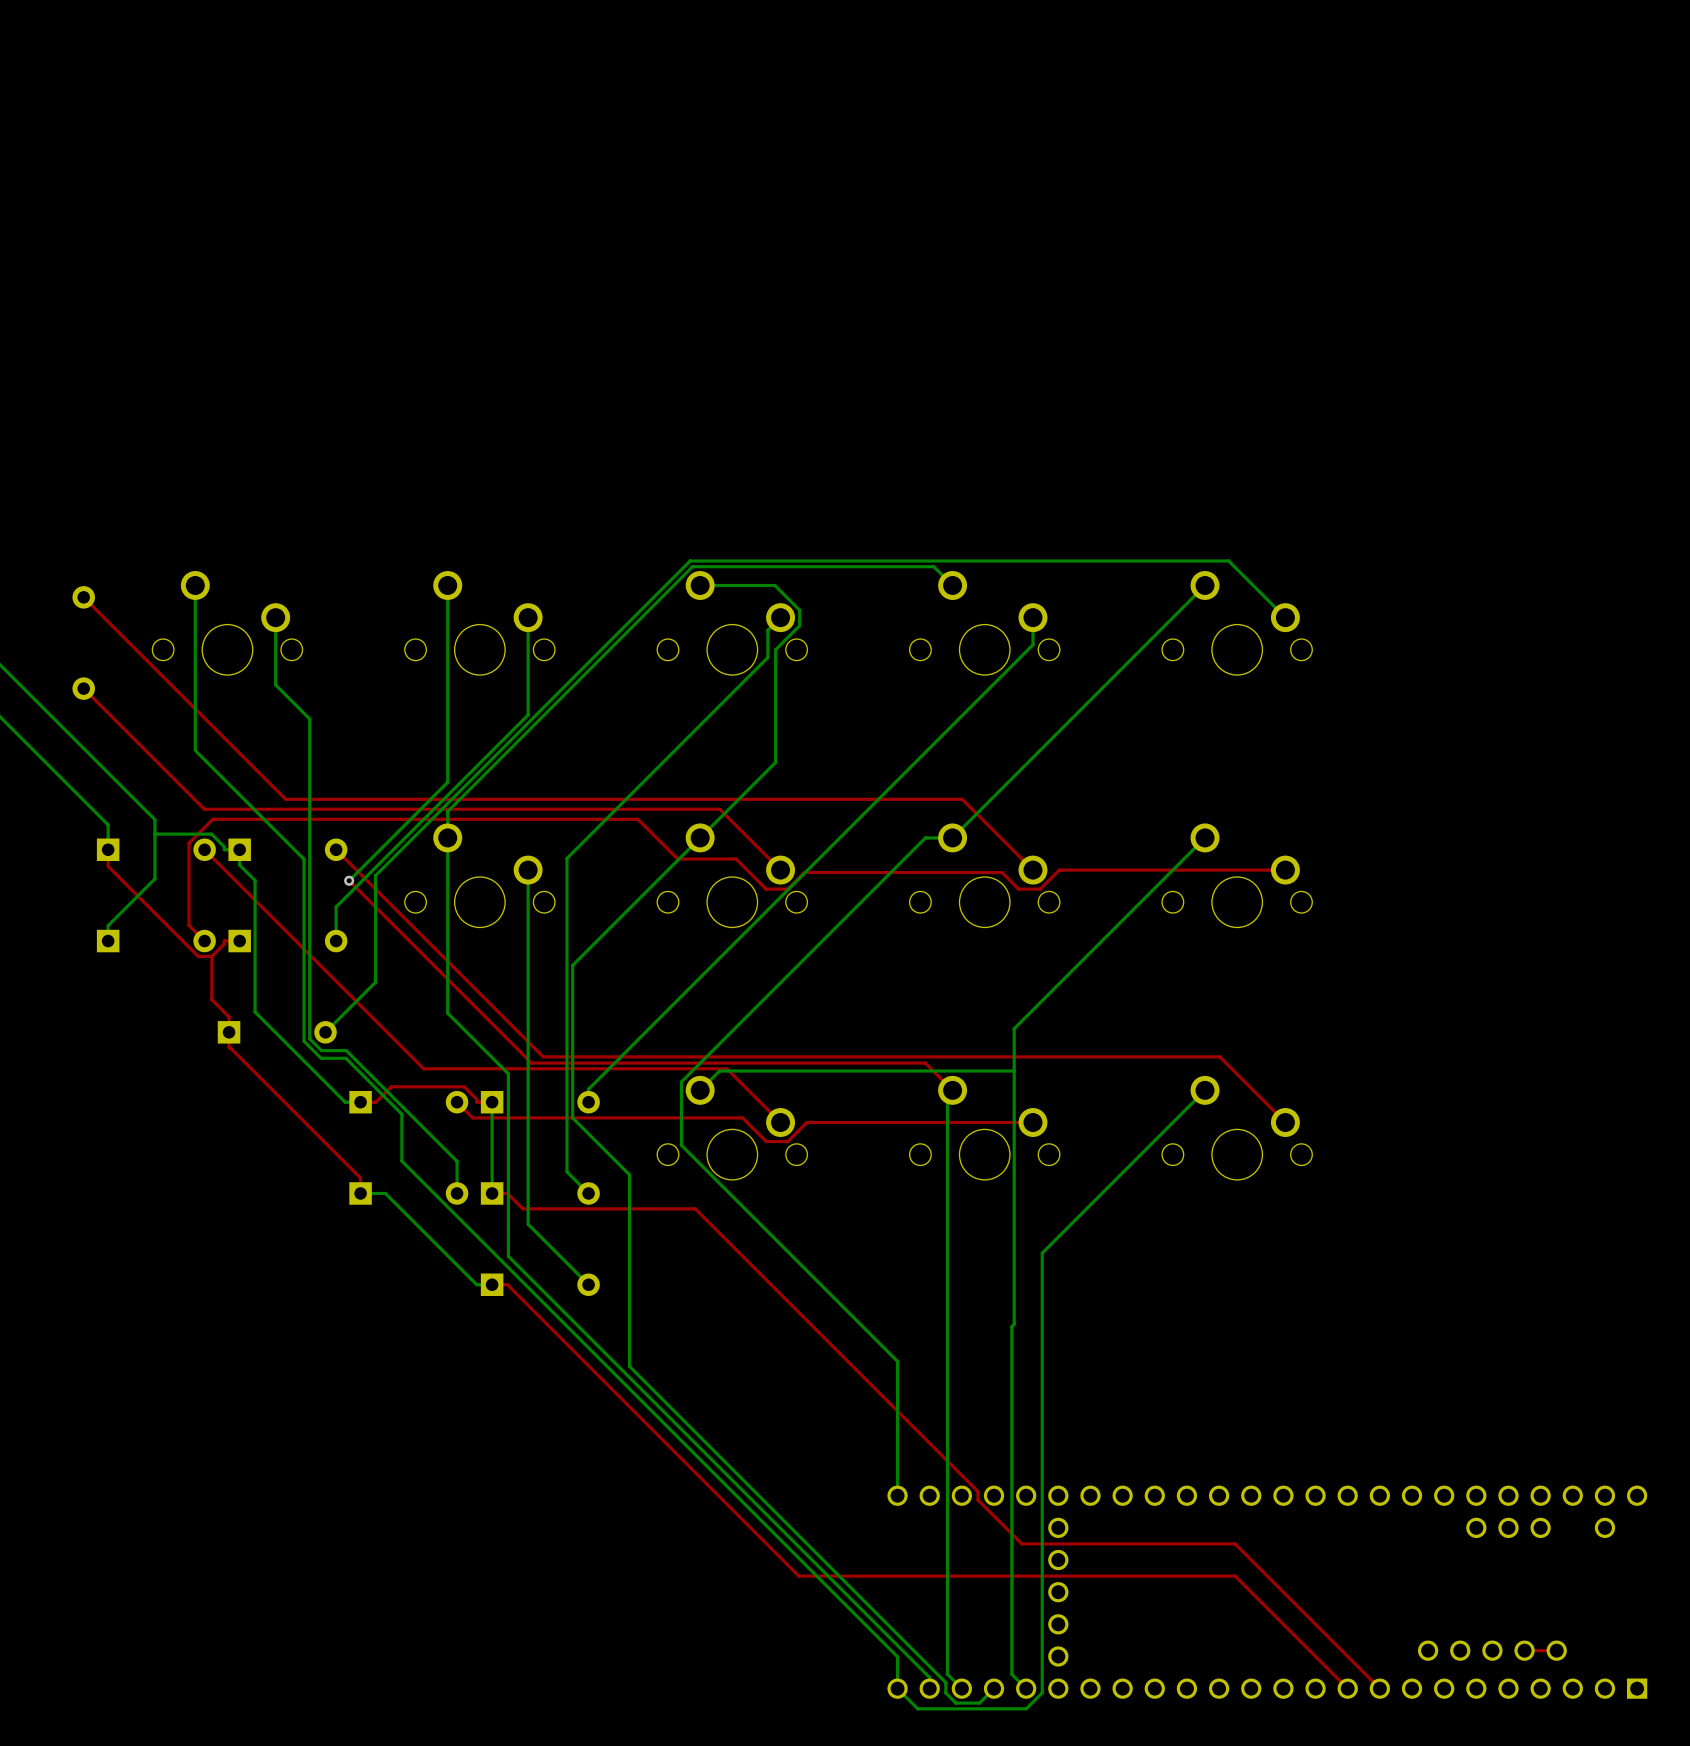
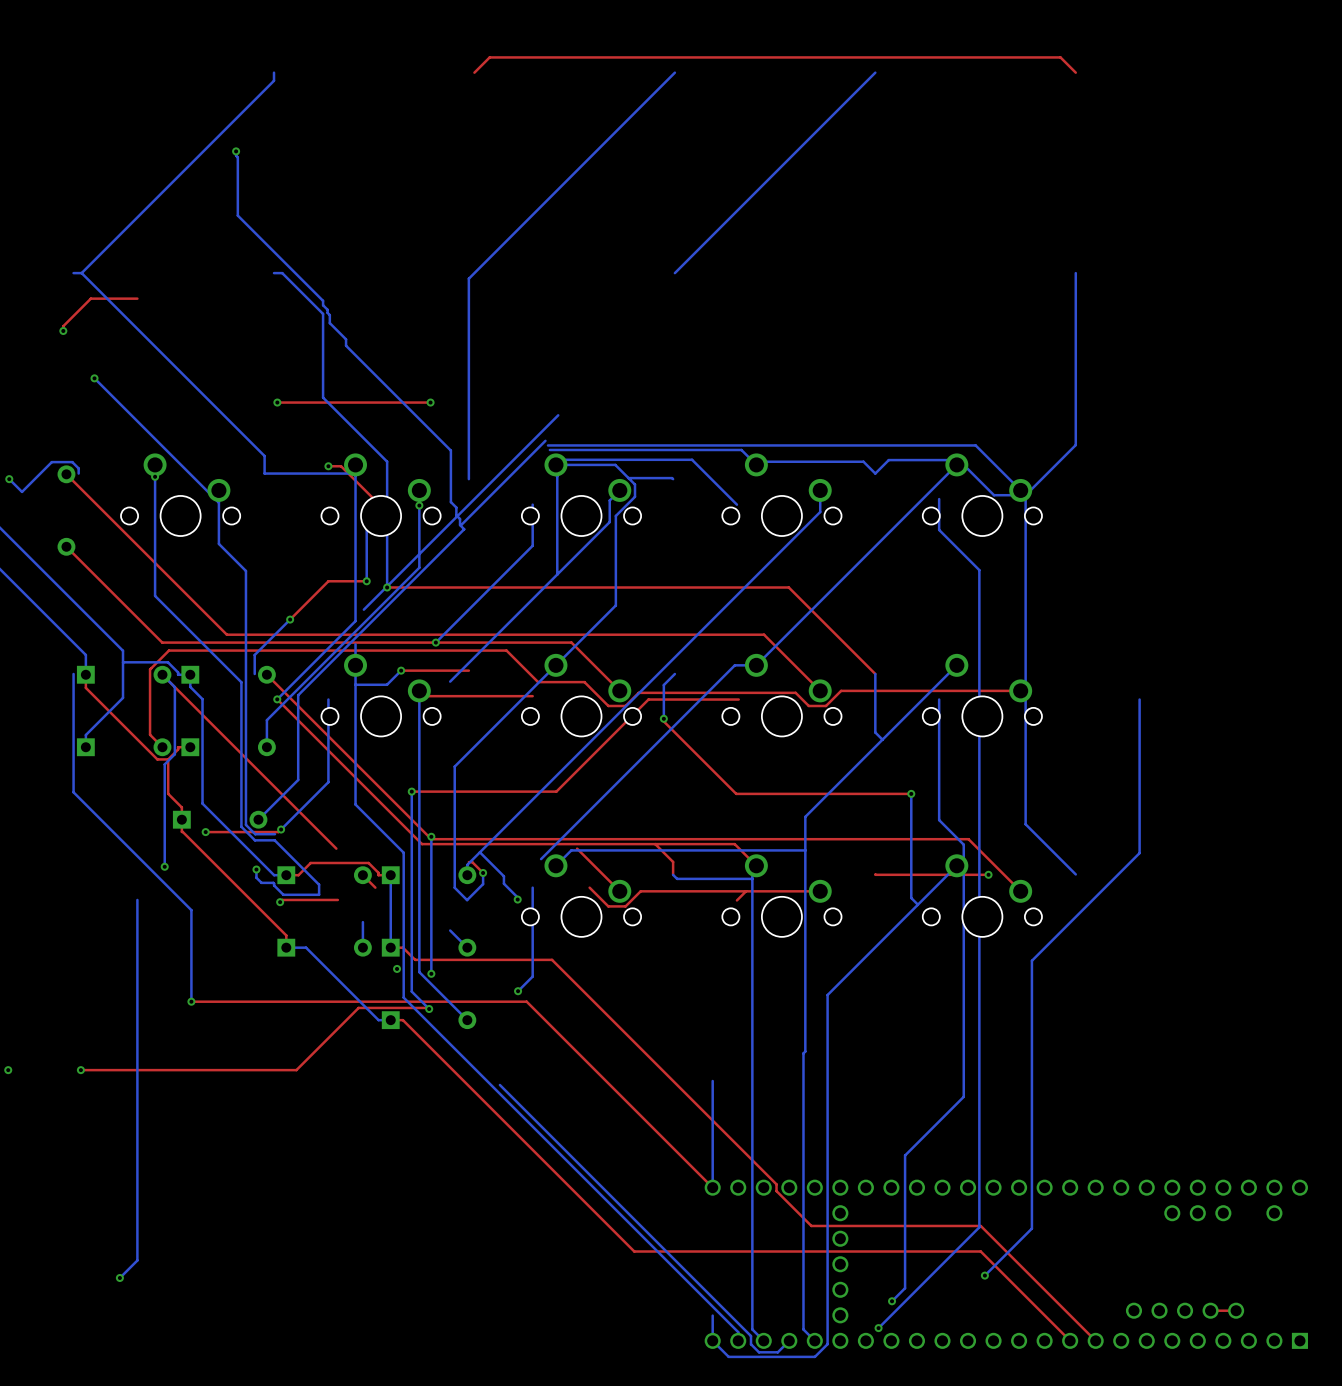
bottom track: none -> (274, 72) (274, 80) (81, 273)
bottom track: none -> (674, 72) (468, 278) (468, 479)
bottom track: none -> (875, 72) (674, 273)
top track: none -> (1075, 72) (1060, 57) (489, 57) (474, 72)
via: none -> (236, 151)
bottom track: none -> (81, 273) (73, 273)
bottom track: none -> (81, 273) (264, 456) (264, 473) (353, 473) (355, 475)
bottom track: none -> (274, 273) (282, 273) (323, 313) (323, 397) (387, 461) (387, 587)
bottom track: none -> (1075, 273) (1075, 445) (1025, 495)
top track: none -> (137, 298) (90, 298) (63, 326) (63, 330)
via: none -> (63, 330)
bottom track: none -> (94, 378) (218, 502)
via: none -> (94, 378)
via: none -> (277, 402)
top track: none -> (430, 402) (277, 402)
via: none -> (430, 402)
bottom track: none -> (545, 440) (461, 524)
bottom track: (690, 561) (584, 666) -> (236, 151) (237, 157) (237, 215) (323, 300) (323, 305) (329, 315) (329, 323) (346, 339) (346, 345) (450, 450) (450, 502) (456, 507) (456, 515) (460, 519) (460, 525) (464, 529)
bottom track: (692, 566) (447, 811) -> (558, 415) (363, 609)
bottom track: none -> (753, 461) (863, 461) (875, 473) (888, 460) (958, 460) (994, 495) (1025, 495)
top track: none -> (328, 466) (341, 466) (379, 504)
via: none -> (328, 466)
bottom track: none -> (78, 473) (78, 468) (72, 462) (51, 462) (22, 491) (9, 479)
via: none -> (155, 476)
bottom track: none -> (628, 478) (673, 479)
via: none -> (9, 479)
bottom track: none -> (1025, 495) (1025, 824) (1075, 874)
bottom track: none -> (939, 499) (939, 529) (979, 570) (979, 1227) (878, 1328)
bottom track: none -> (379, 504) (366, 517) (366, 581)
bottom track: none -> (532, 504) (532, 545) (435, 642)
bottom track: none -> (736, 504) (692, 459) (554, 459) (551, 463) (551, 470) (557, 476) (557, 574)
via: none -> (419, 505)
top track: none -> (366, 581) (328, 581) (290, 619)
via: none -> (366, 581)
top track: none -> (387, 587) (788, 587) (875, 673)
via: none -> (387, 587)
bottom track: none -> (290, 619) (254, 654) (254, 673)
via: none -> (290, 619)
via: none -> (435, 642)
bottom track: none -> (401, 670) (387, 684) (355, 684)
via: none -> (401, 670)
top track: none -> (468, 670) (401, 670)
bottom track: none -> (73, 673) (73, 792) (191, 910) (191, 1001)
bottom track: none -> (674, 673) (663, 685) (663, 718)
bottom track: none -> (875, 673) (875, 732) (882, 739)
bottom track: none -> (162, 674) (174, 687) (174, 754) (164, 764) (164, 866)
bottom track: (566, 858) (566, 1171) -> none
top track: none -> (532, 696) (423, 696)
bottom track: none -> (328, 699) (328, 782) (281, 829)
top track: none -> (738, 699) (648, 699) (556, 791) (411, 791)
bottom track: none -> (939, 699) (939, 820) (963, 844) (963, 1096) (905, 1155) (905, 1288) (892, 1301)
bottom track: none -> (1139, 699) (1139, 853) (1031, 960) (1031, 1228) (984, 1275)
top track: none -> (663, 718) (663, 721) (736, 793) (911, 793)
via: none -> (663, 718)
bottom track: none -> (411, 791) (411, 991) (429, 1009)
via: none -> (411, 791)
bottom track: none -> (911, 793) (911, 898) (917, 904)
via: none -> (911, 793)
top track: none -> (281, 829) (278, 832) (205, 832)
via: none -> (281, 829)
via: none -> (205, 832)
bottom track: (346, 1050) (457, 1161) -> none
bottom track: none -> (431, 836) (431, 973)
via: none -> (431, 836)
top track: none -> (655, 844) (673, 861) (673, 874)
top track: (726, 1068) (423, 1068) -> none
bottom track: none -> (479, 852) (503, 876) (503, 883) (517, 899)
bottom track: (681, 1081) (681, 1145) (897, 1361) -> none
top track: none -> (468, 862) (472, 862) (483, 872)
via: none -> (164, 866)
via: none -> (256, 869)
via: none -> (483, 872)
bottom track: none -> (673, 874) (677, 878) (752, 878)
top track: none -> (875, 874) (988, 874)
via: none -> (988, 874)
bottom track: none -> (532, 887) (532, 976) (518, 991)
top track: (742, 1117) (472, 1117) -> none
top track: none -> (746, 891) (736, 900)
bottom track: (401, 1126) (401, 1161) (897, 1656) -> (319, 894) (283, 894) (273, 882) (261, 882) (256, 877) (256, 869)
via: none -> (517, 899)
bottom track: none -> (137, 899) (137, 1260) (119, 1277)
top track: none -> (337, 899) (282, 899) (280, 902)
bottom track: (588, 1133) (629, 1174) (629, 1366) -> (467, 900) (483, 884) (483, 872)
via: none -> (280, 902)
via: none -> (397, 968)
via: none -> (431, 973)
via: none -> (518, 991)
top track: none -> (191, 1001) (526, 1001) (712, 1187)
via: none -> (191, 1001)
top track: none -> (429, 1009) (358, 1007) (296, 1070) (80, 1070)
via: none -> (429, 1009)
via: none -> (8, 1070)
via: none -> (80, 1070)
via: none -> (984, 1275)
via: none -> (119, 1277)
via: none -> (892, 1301)
via: none -> (878, 1328)

